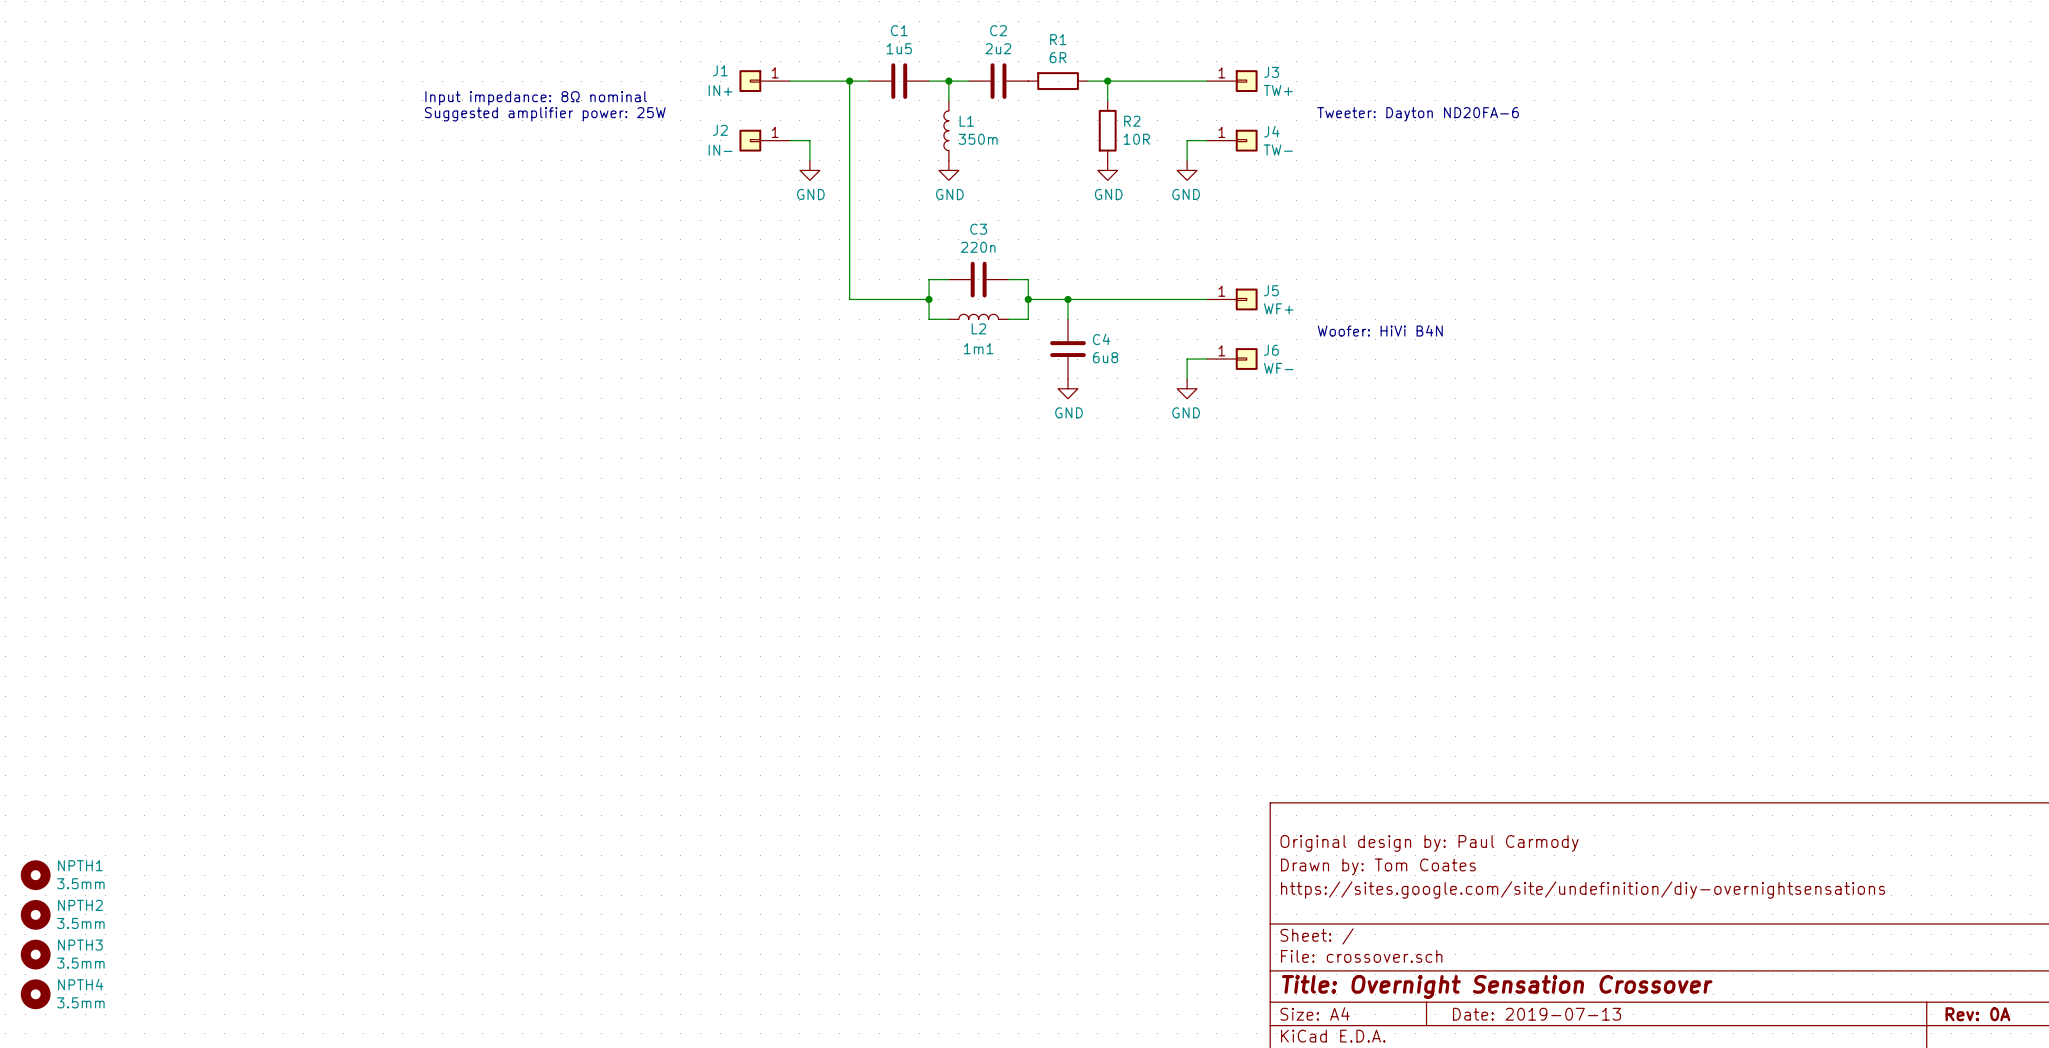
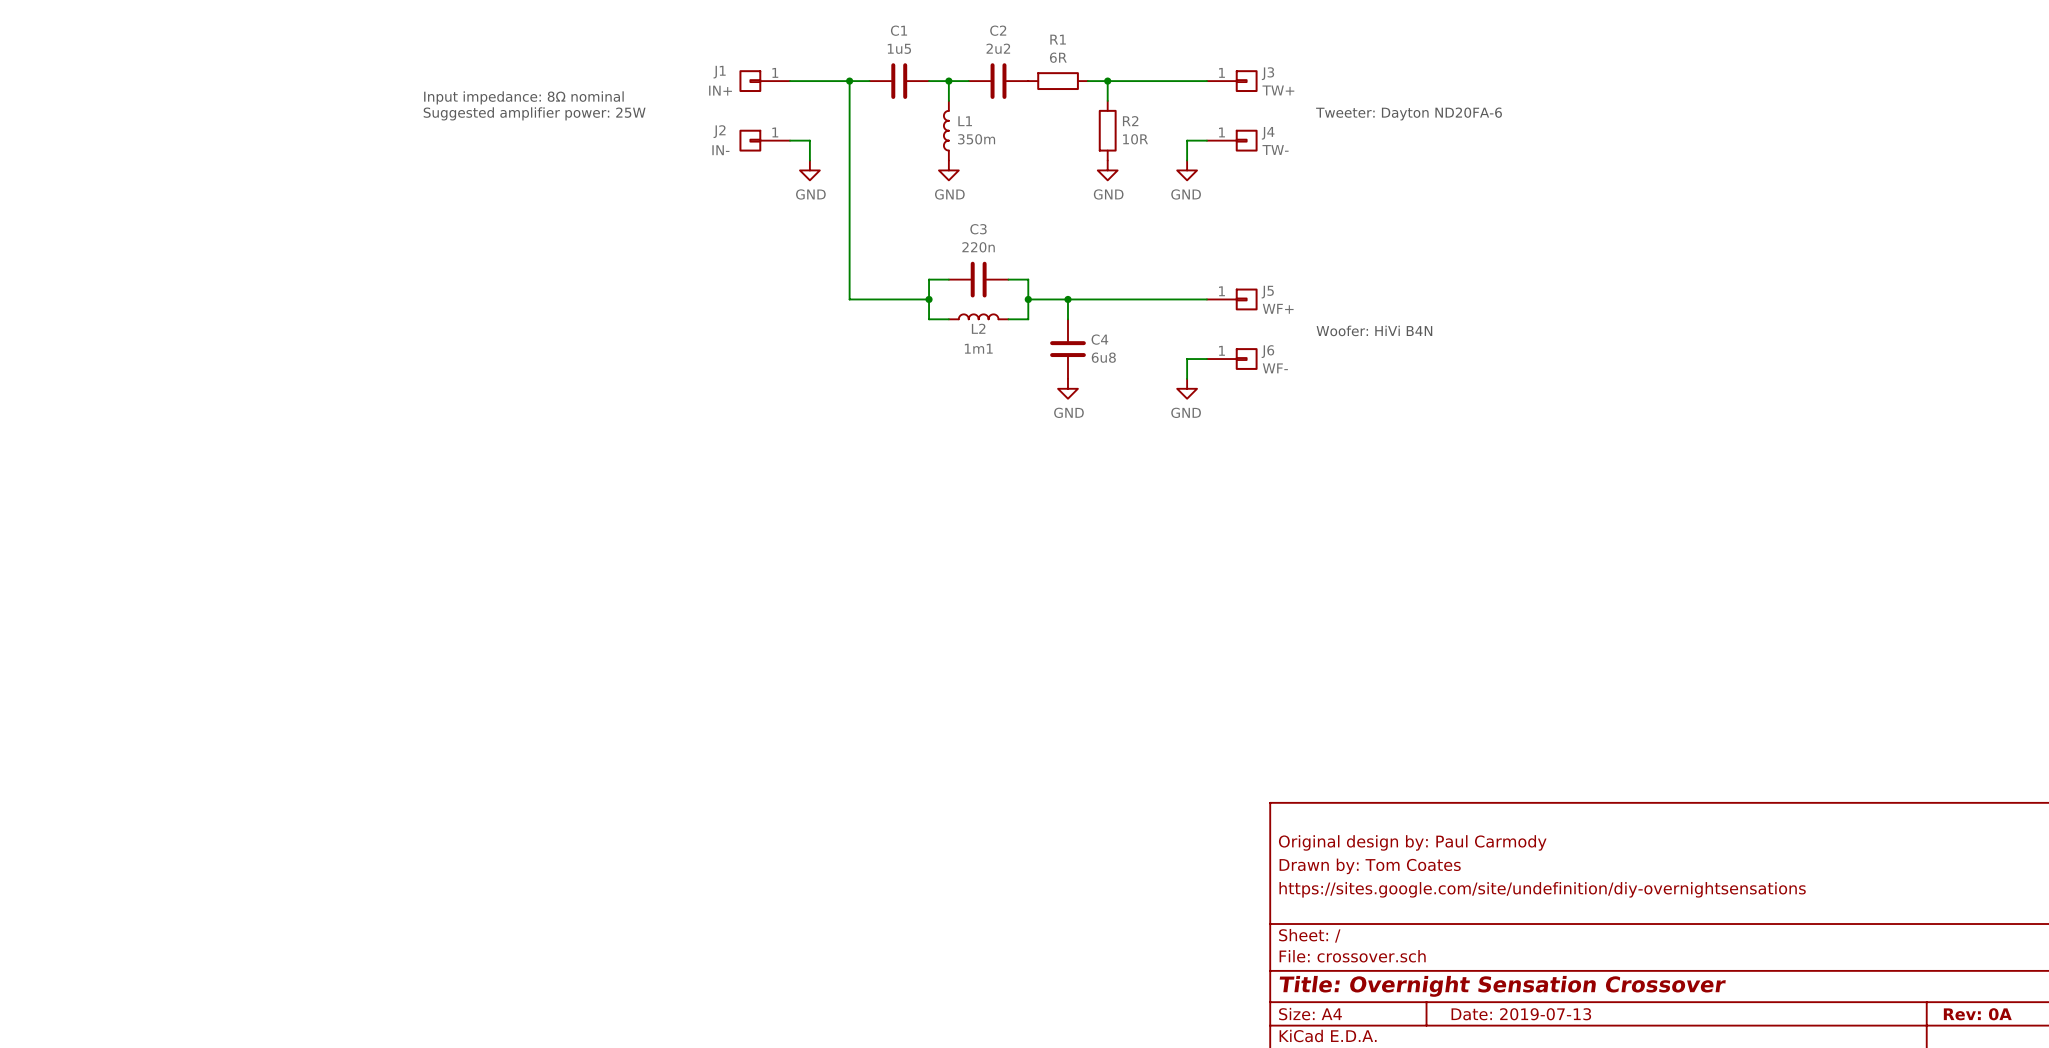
NPTH1: 3.5mm (35, 875) -> none
NPTH2: 3.5mm (35, 914) -> none
NPTH3: 3.5mm (35, 954) -> none
NPTH4: 3.5mm (35, 994) -> none

